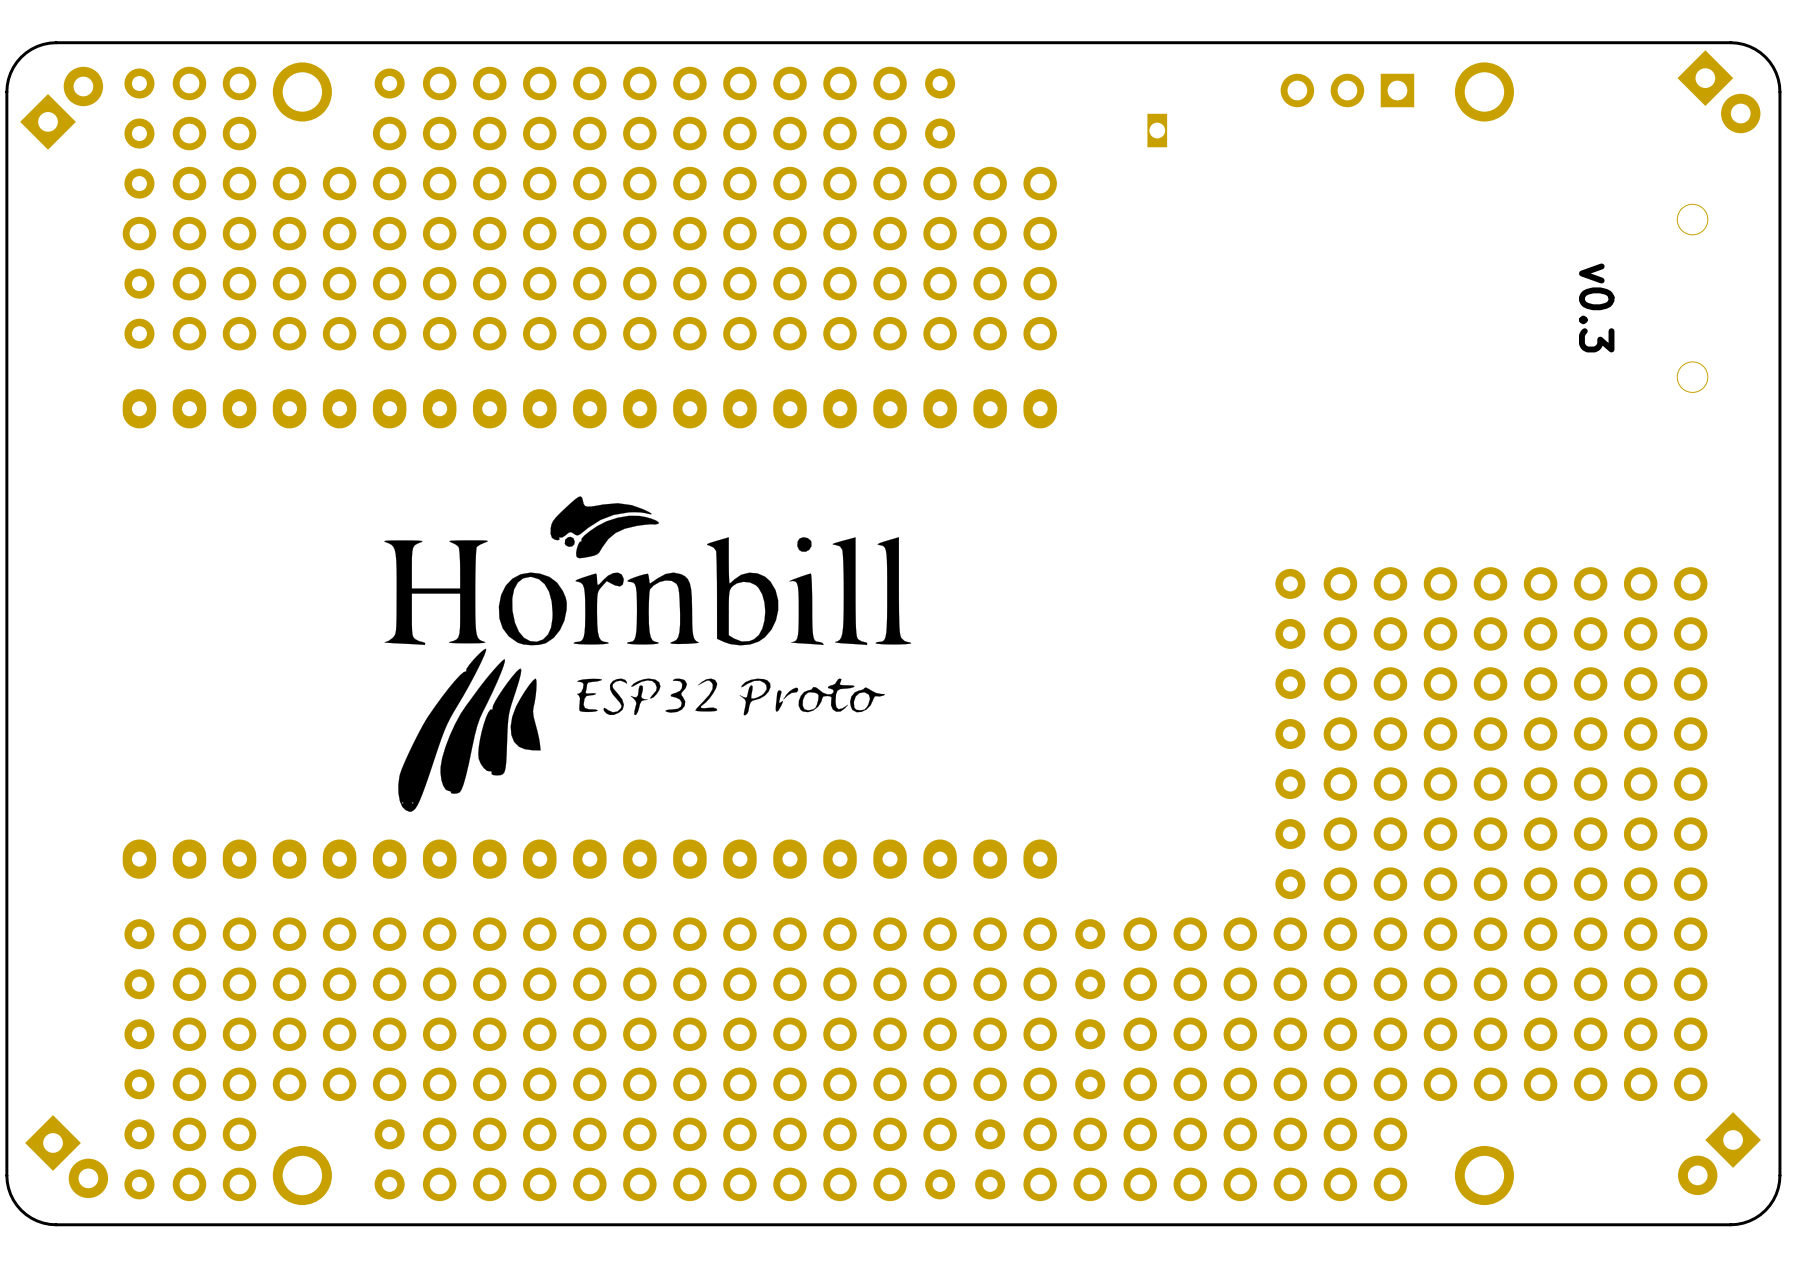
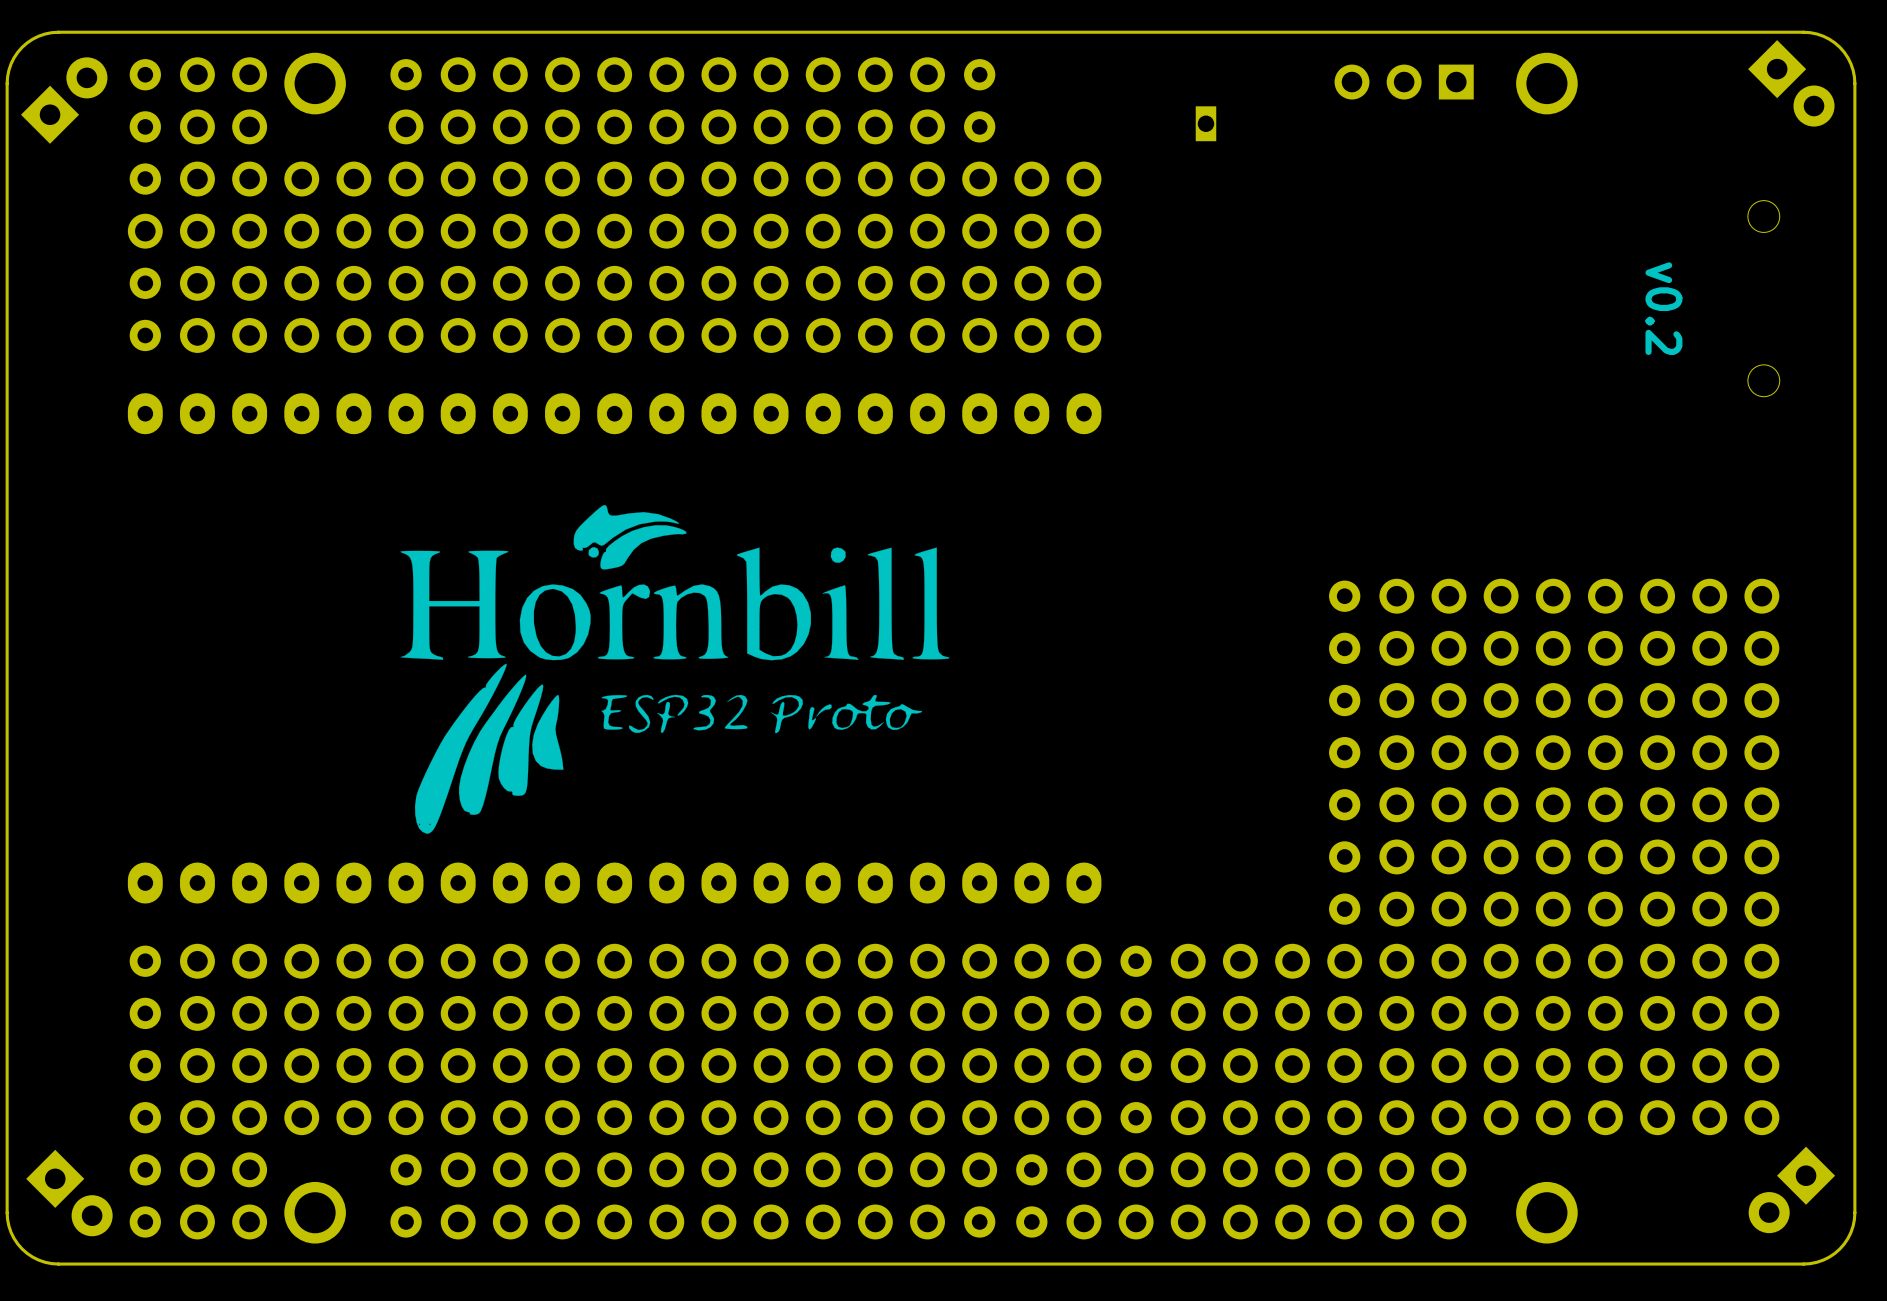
text: v0.3 (1596, 307) -> v0.2 (1663, 308)

